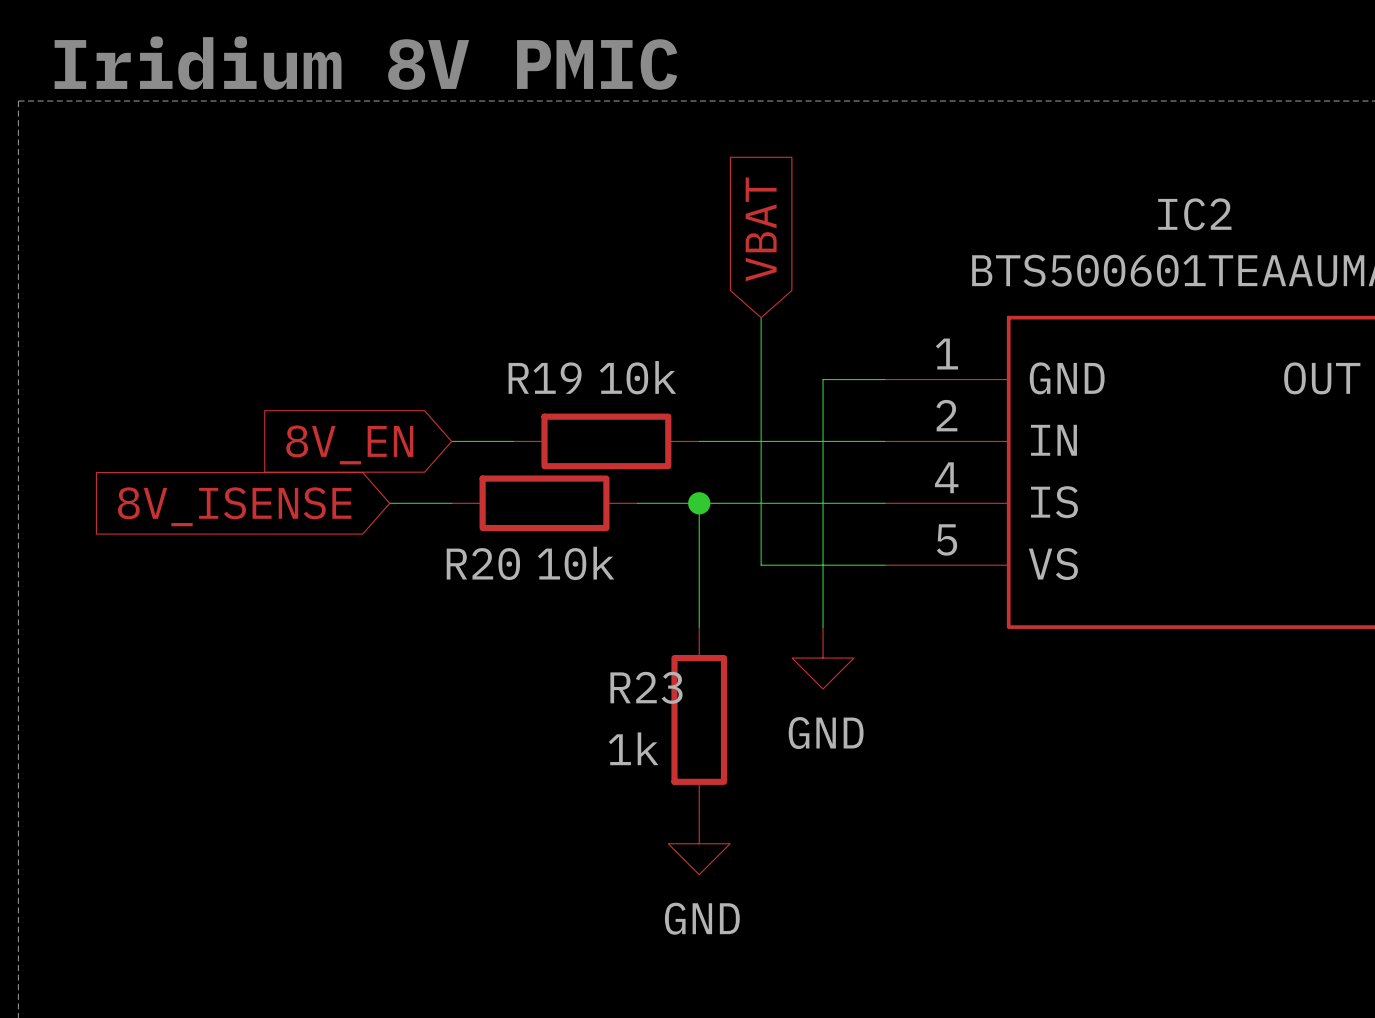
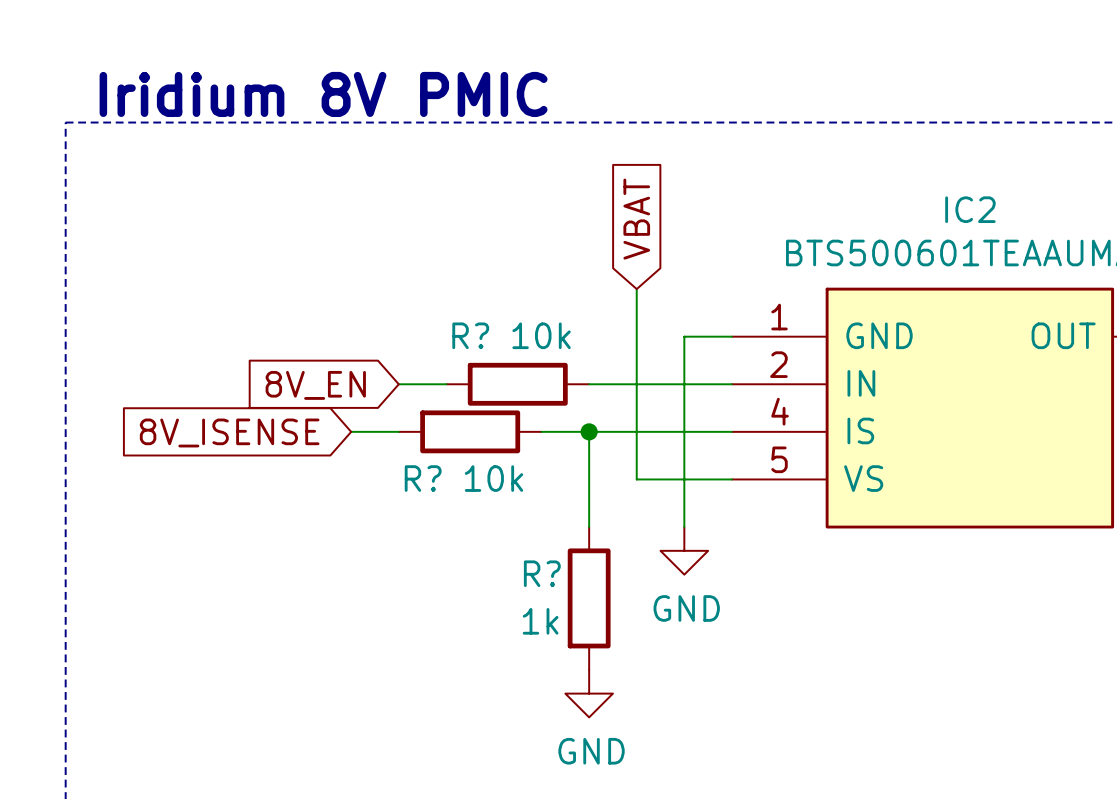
R19 name: R19 (545, 378) -> R? (470, 335)
R20 name: R20 (483, 564) -> R? (423, 478)
R23 name: R23 (646, 687) -> R? (542, 573)

